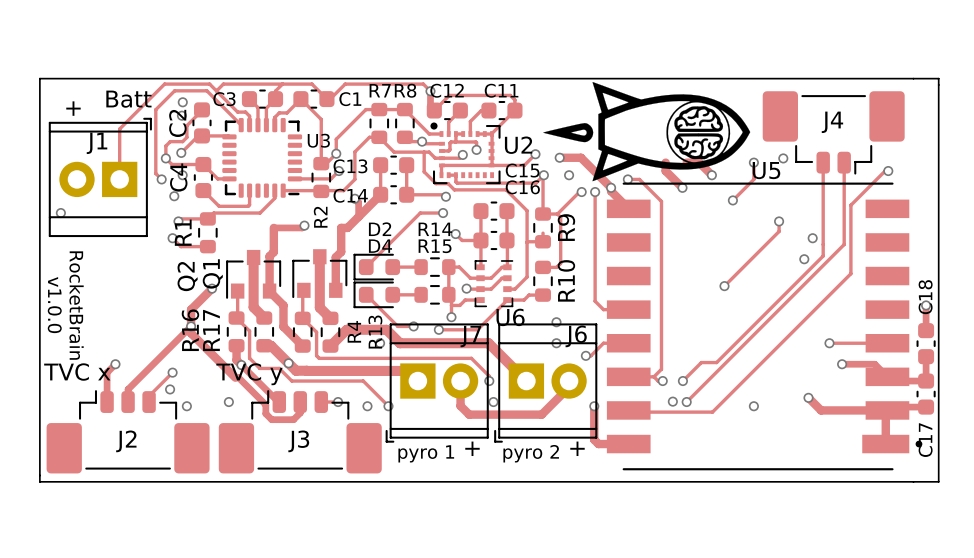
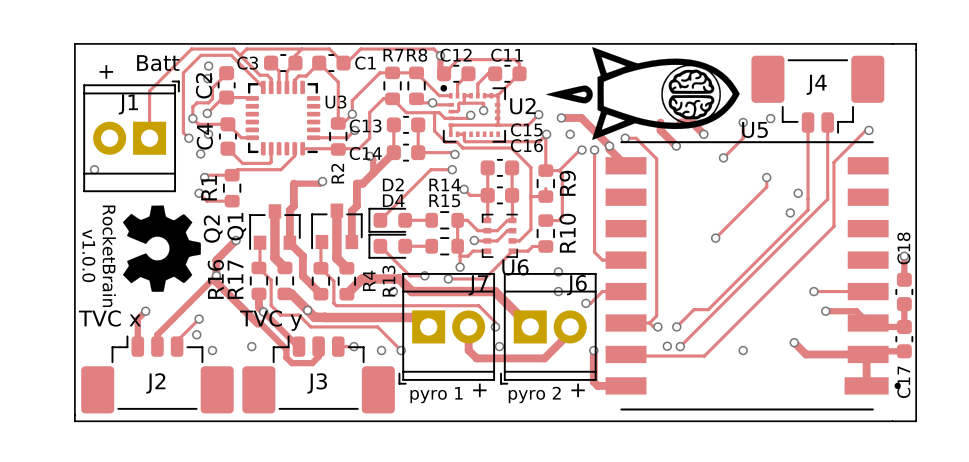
drawing: none -> [122, 205, 201, 292]

